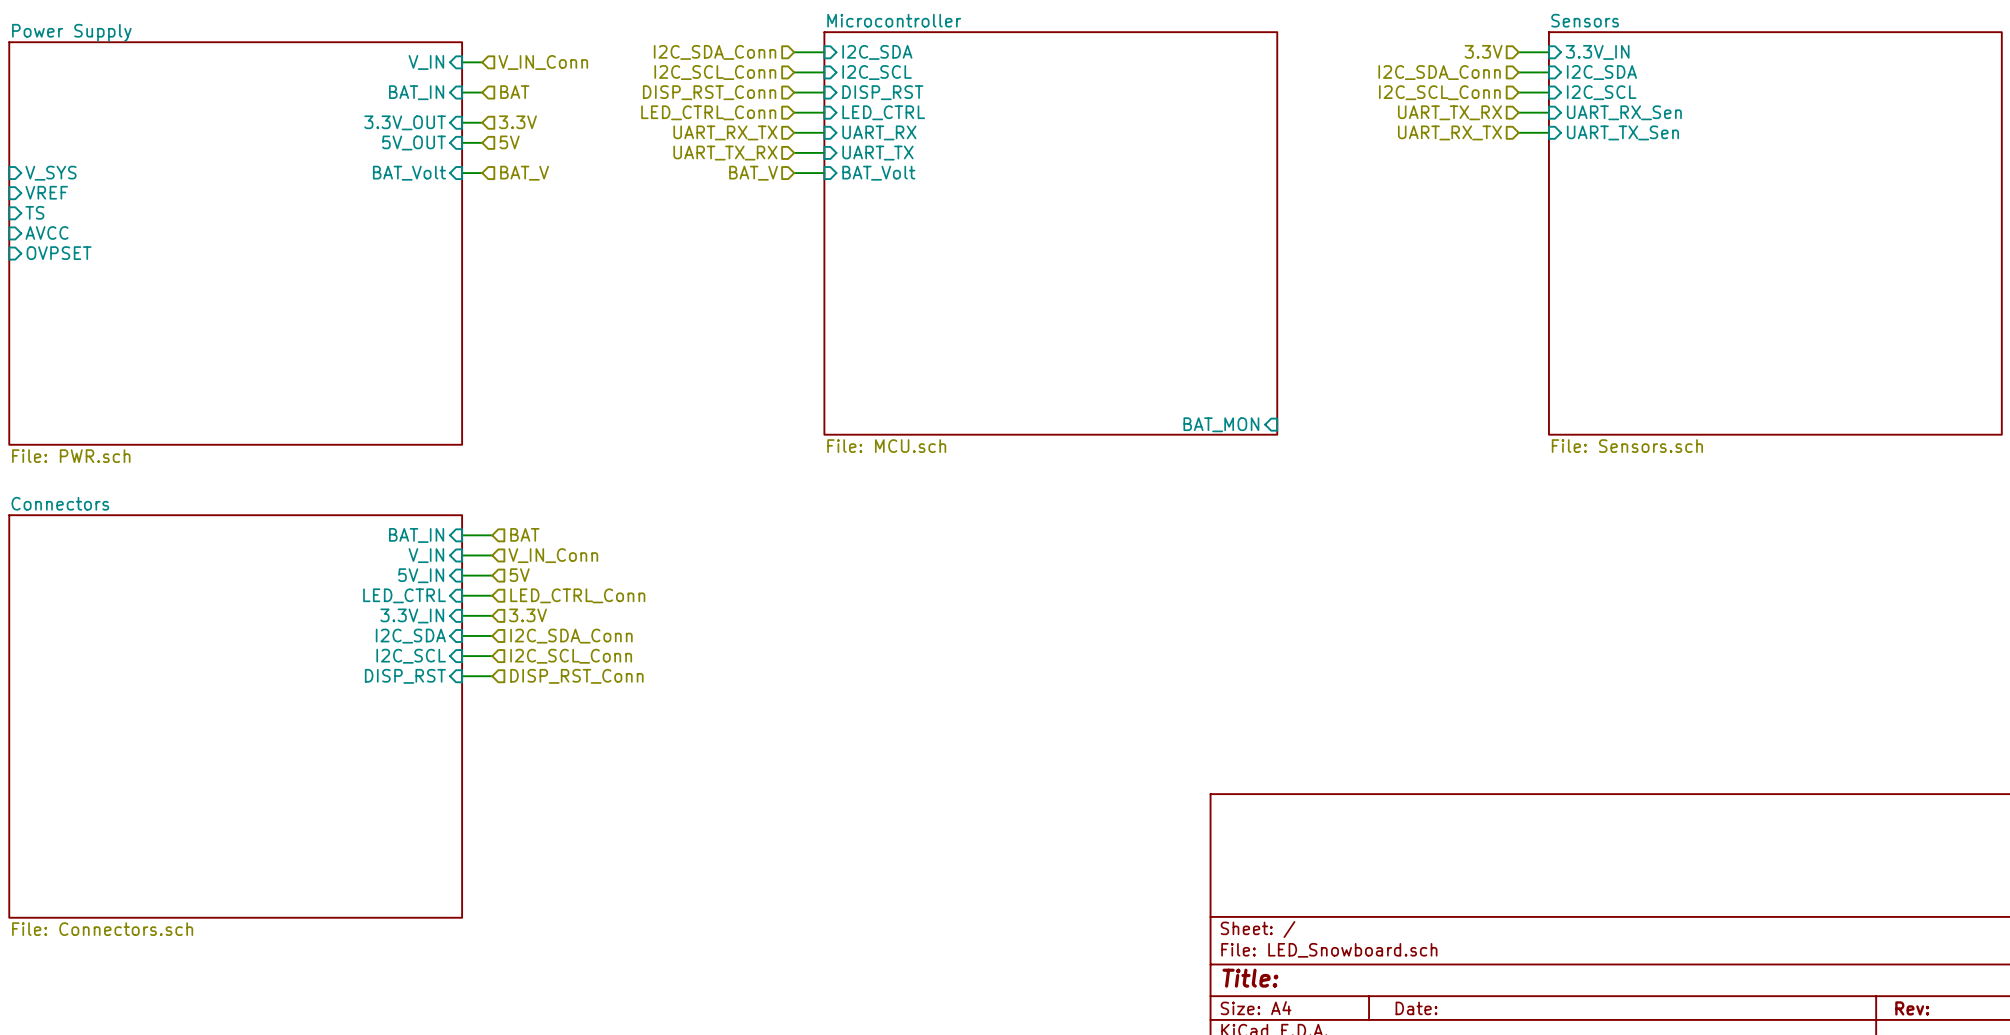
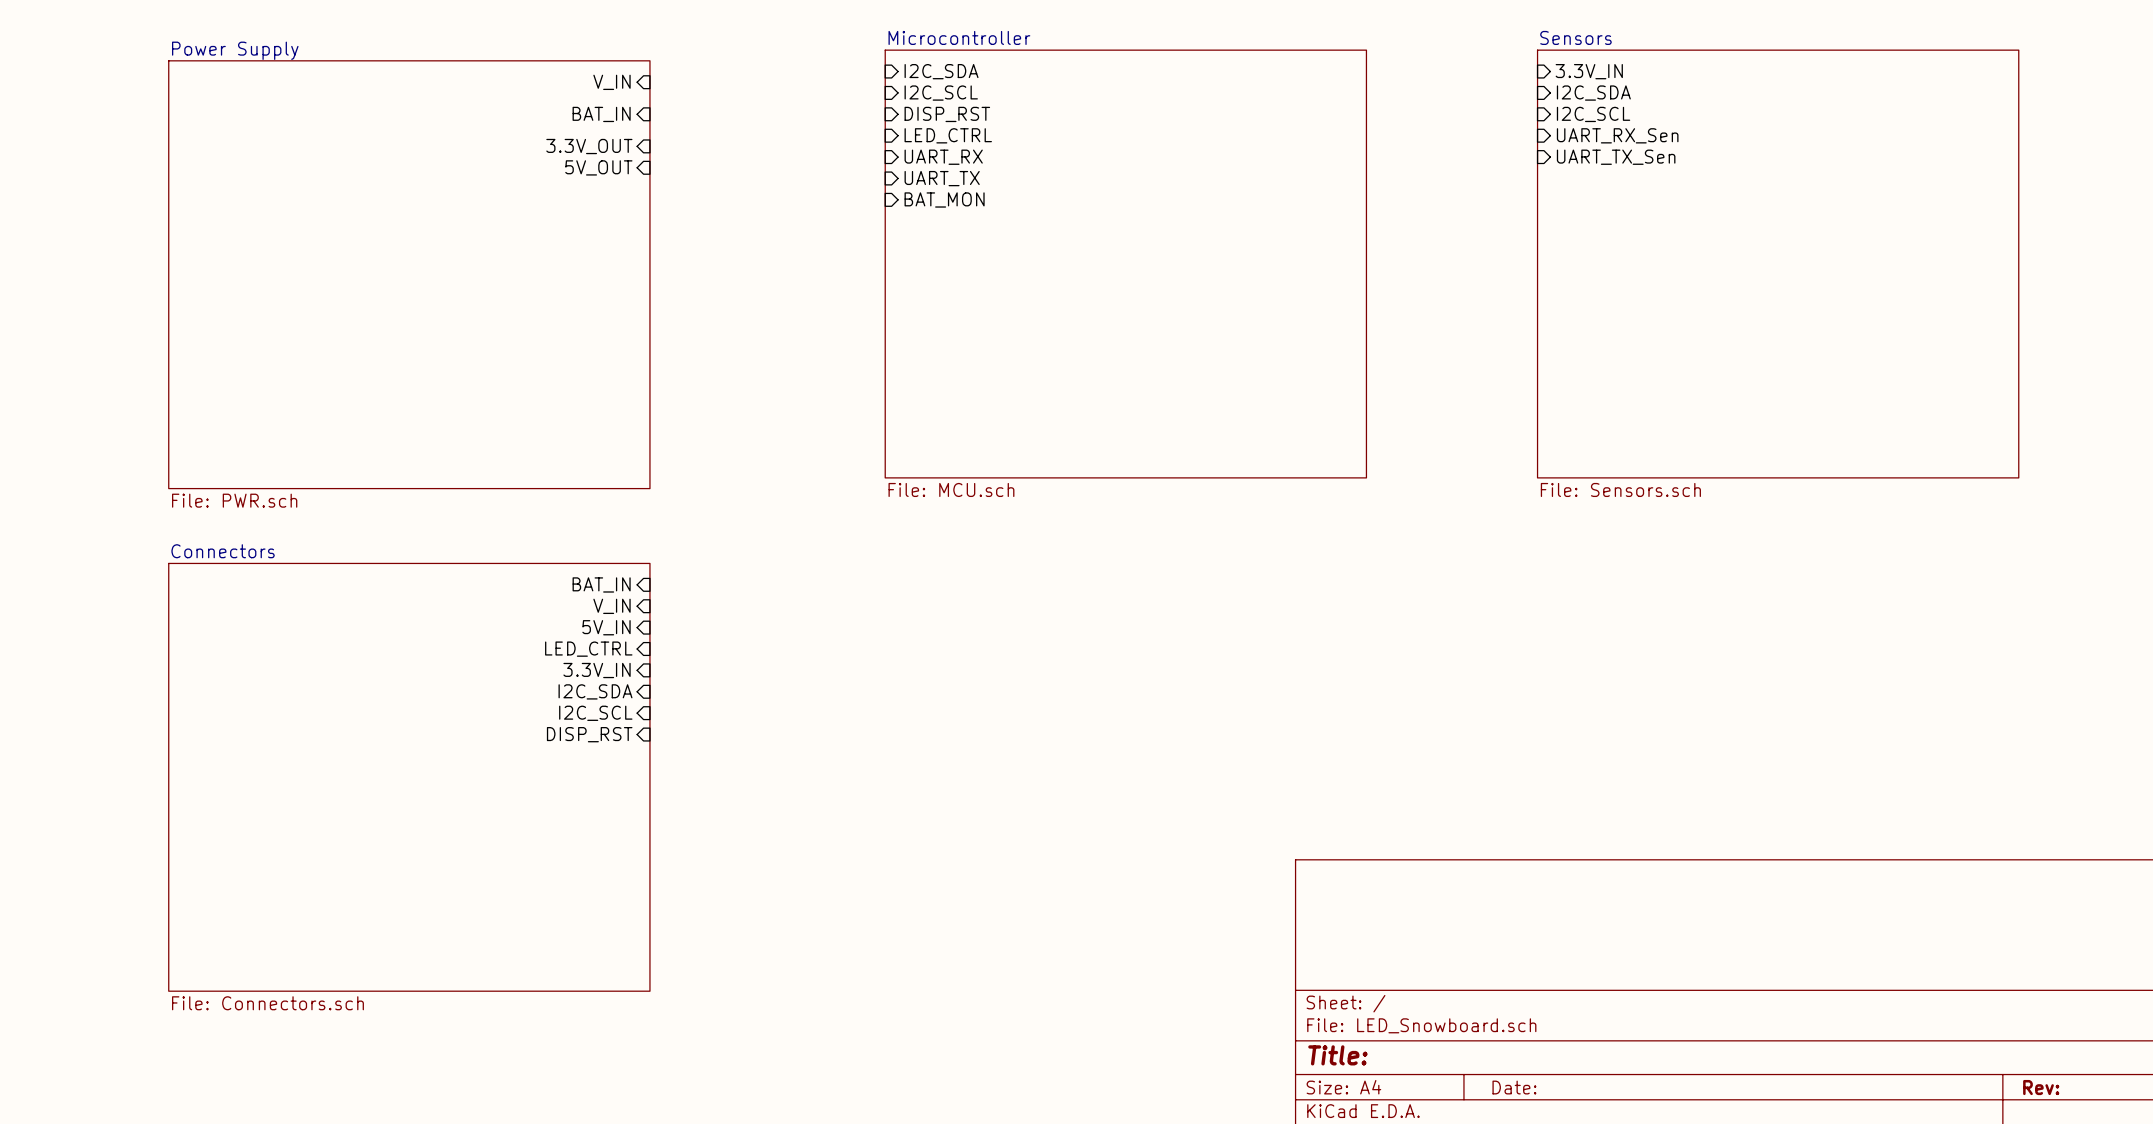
hierarchical label: 3.3V (1483, 51) -> none
hierarchical label: I2C_SDA_Conn (715, 52) -> none
wire: (794, 52) (824, 52) -> none
wire: (1518, 52) (1548, 52) -> none
sheet pin position: 3.3V_IN (1597, 52) -> 3.3V_IN (1589, 71)
sheet pin position: V_IN (426, 62) -> V_IN (611, 82)
wire: (462, 62) (482, 62) -> none
hierarchical label: V_IN_Conn (543, 62) -> none
hierarchical label: I2C_SCL_Conn (715, 72) -> none
wire: (794, 72) (824, 72) -> none
hierarchical label: I2C_SDA_Conn (1439, 72) -> none
wire: (1518, 72) (1548, 72) -> none
sheet pin position: I2C_SDA (1601, 72) -> I2C_SDA (1593, 93)
sheet pin position: BAT_IN (416, 92) -> BAT_IN (601, 114)
wire: (462, 92) (482, 92) -> none
hierarchical label: BAT (514, 92) -> none
hierarchical label: DISP_RST_Conn (709, 92) -> none
wire: (794, 92) (824, 92) -> none
hierarchical label: I2C_SCL_Conn (1439, 92) -> none
wire: (1518, 92) (1548, 92) -> none
sheet pin position: I2C_SCL (1601, 92) -> I2C_SCL (1593, 114)
hierarchical label: LED_CTRL_Conn (708, 112) -> none
wire: (794, 112) (824, 112) -> none
hierarchical label: UART_TX_RX (1449, 112) -> none
wire: (1518, 112) (1548, 112) -> none
sheet pin position: UART_RX_Sen (1624, 112) -> UART_RX_Sen (1617, 135)
sheet pin position: 3.3V_OUT (405, 122) -> 3.3V_OUT (589, 146)
wire: (462, 122) (482, 122) -> none
hierarchical label: 3.3V (517, 122) -> none
hierarchical label: UART_RX_TX (725, 132) -> none
wire: (794, 132) (824, 132) -> none
hierarchical label: UART_RX_TX (1449, 132) -> none
wire: (1518, 132) (1548, 132) -> none
sheet pin position: UART_TX_Sen (1622, 132) -> UART_TX_Sen (1616, 157)
sheet pin position: 5V_OUT (414, 142) -> 5V_OUT (598, 167)
wire: (462, 142) (482, 142) -> none
hierarchical label: 5V (509, 142) -> none
wire: (794, 152) (824, 152) -> none
hierarchical label: UART_TX_RX (725, 153) -> none
sheet pin: V_SYS (51, 173) -> none
sheet pin: BAT_Volt (409, 173) -> none
wire: (462, 173) (482, 173) -> none
hierarchical label: BAT_V (524, 173) -> none
hierarchical label: BAT_V (753, 173) -> none
wire: (794, 173) (824, 173) -> none
sheet pin: BAT_Volt (878, 173) -> BAT_MON (944, 199)
sheet pin: VREF (46, 192) -> none
sheet pin: TS (34, 212) -> none
sheet pin: AVCC (46, 232) -> none
sheet Sensors position: (1775, 233) -> (1778, 264)
sheet Power Supply position: (235, 243) -> (409, 274)
sheet pin: OVPSET (59, 253) -> none
sheet pin: BAT_MON (1221, 424) -> none
hierarchical label: BAT (524, 534) -> none
sheet pin position: BAT_IN (416, 535) -> BAT_IN (601, 584)
wire: (462, 535) (492, 535) -> none
sheet pin position: V_IN (426, 555) -> V_IN (611, 606)
wire: (462, 555) (492, 555) -> none
hierarchical label: V_IN_Conn (553, 555) -> none
sheet pin position: 5V_IN (421, 575) -> 5V_IN (606, 627)
wire: (462, 575) (492, 575) -> none
hierarchical label: 5V (519, 575) -> none
sheet pin position: LED_CTRL (404, 595) -> LED_CTRL (588, 649)
wire: (462, 595) (492, 595) -> none
hierarchical label: LED_CTRL_Conn (577, 595) -> none
sheet pin position: 3.3V_IN (412, 615) -> 3.3V_IN (597, 670)
wire: (462, 615) (492, 615) -> none
hierarchical label: 3.3V (528, 615) -> none
wire: (462, 635) (492, 635) -> none
sheet pin position: I2C_SDA (410, 636) -> I2C_SDA (595, 691)
hierarchical label: I2C_SDA_Conn (571, 636) -> none
sheet pin position: I2C_SCL (411, 656) -> I2C_SCL (595, 713)
wire: (462, 656) (492, 656) -> none
hierarchical label: I2C_SCL_Conn (571, 656) -> none
sheet pin position: DISP_RST (405, 676) -> DISP_RST (589, 734)
wire: (462, 676) (492, 676) -> none
hierarchical label: DISP_RST_Conn (576, 676) -> none
sheet Connectors position: (235, 716) -> (409, 777)

